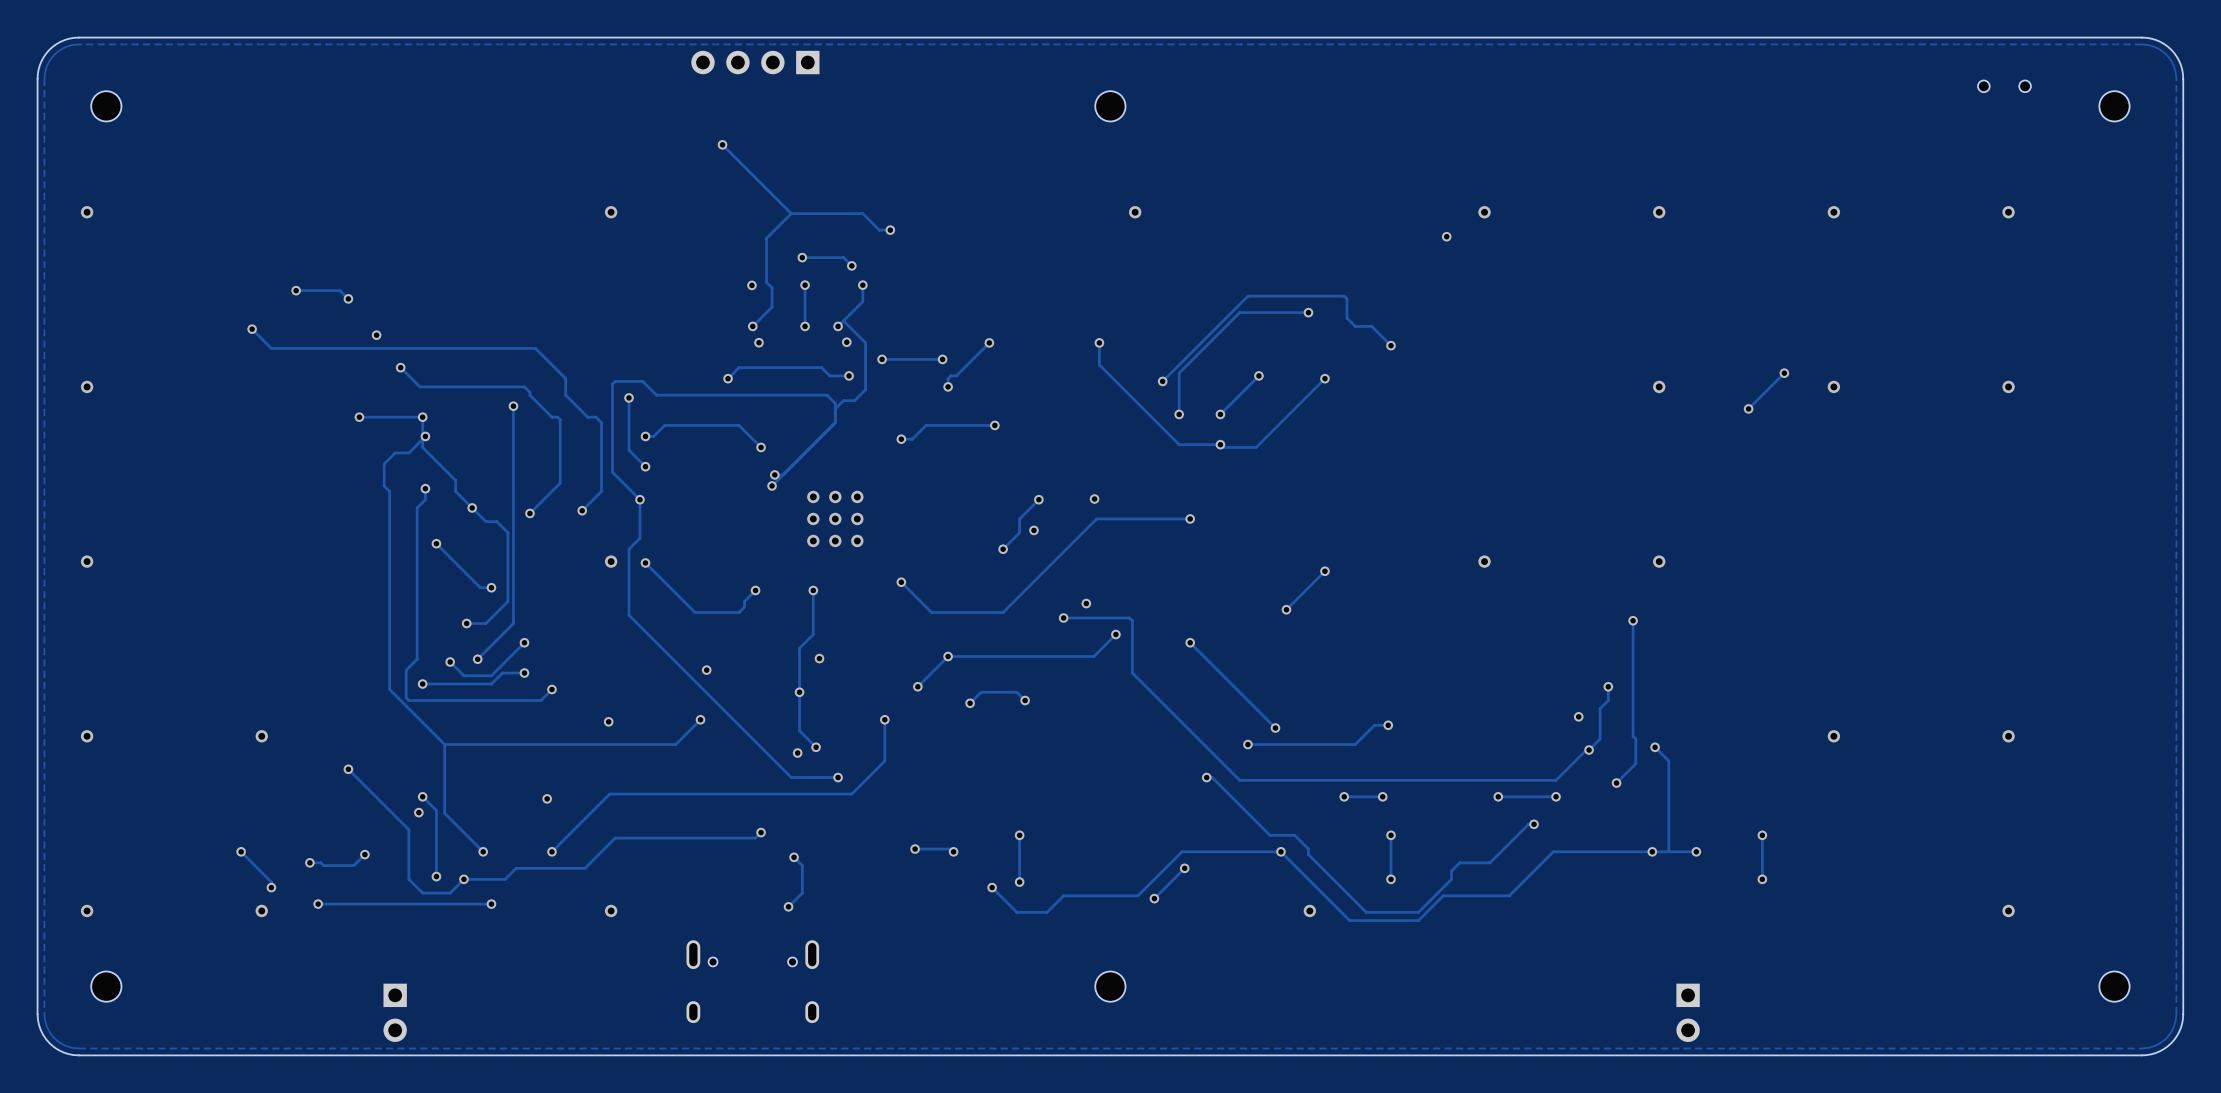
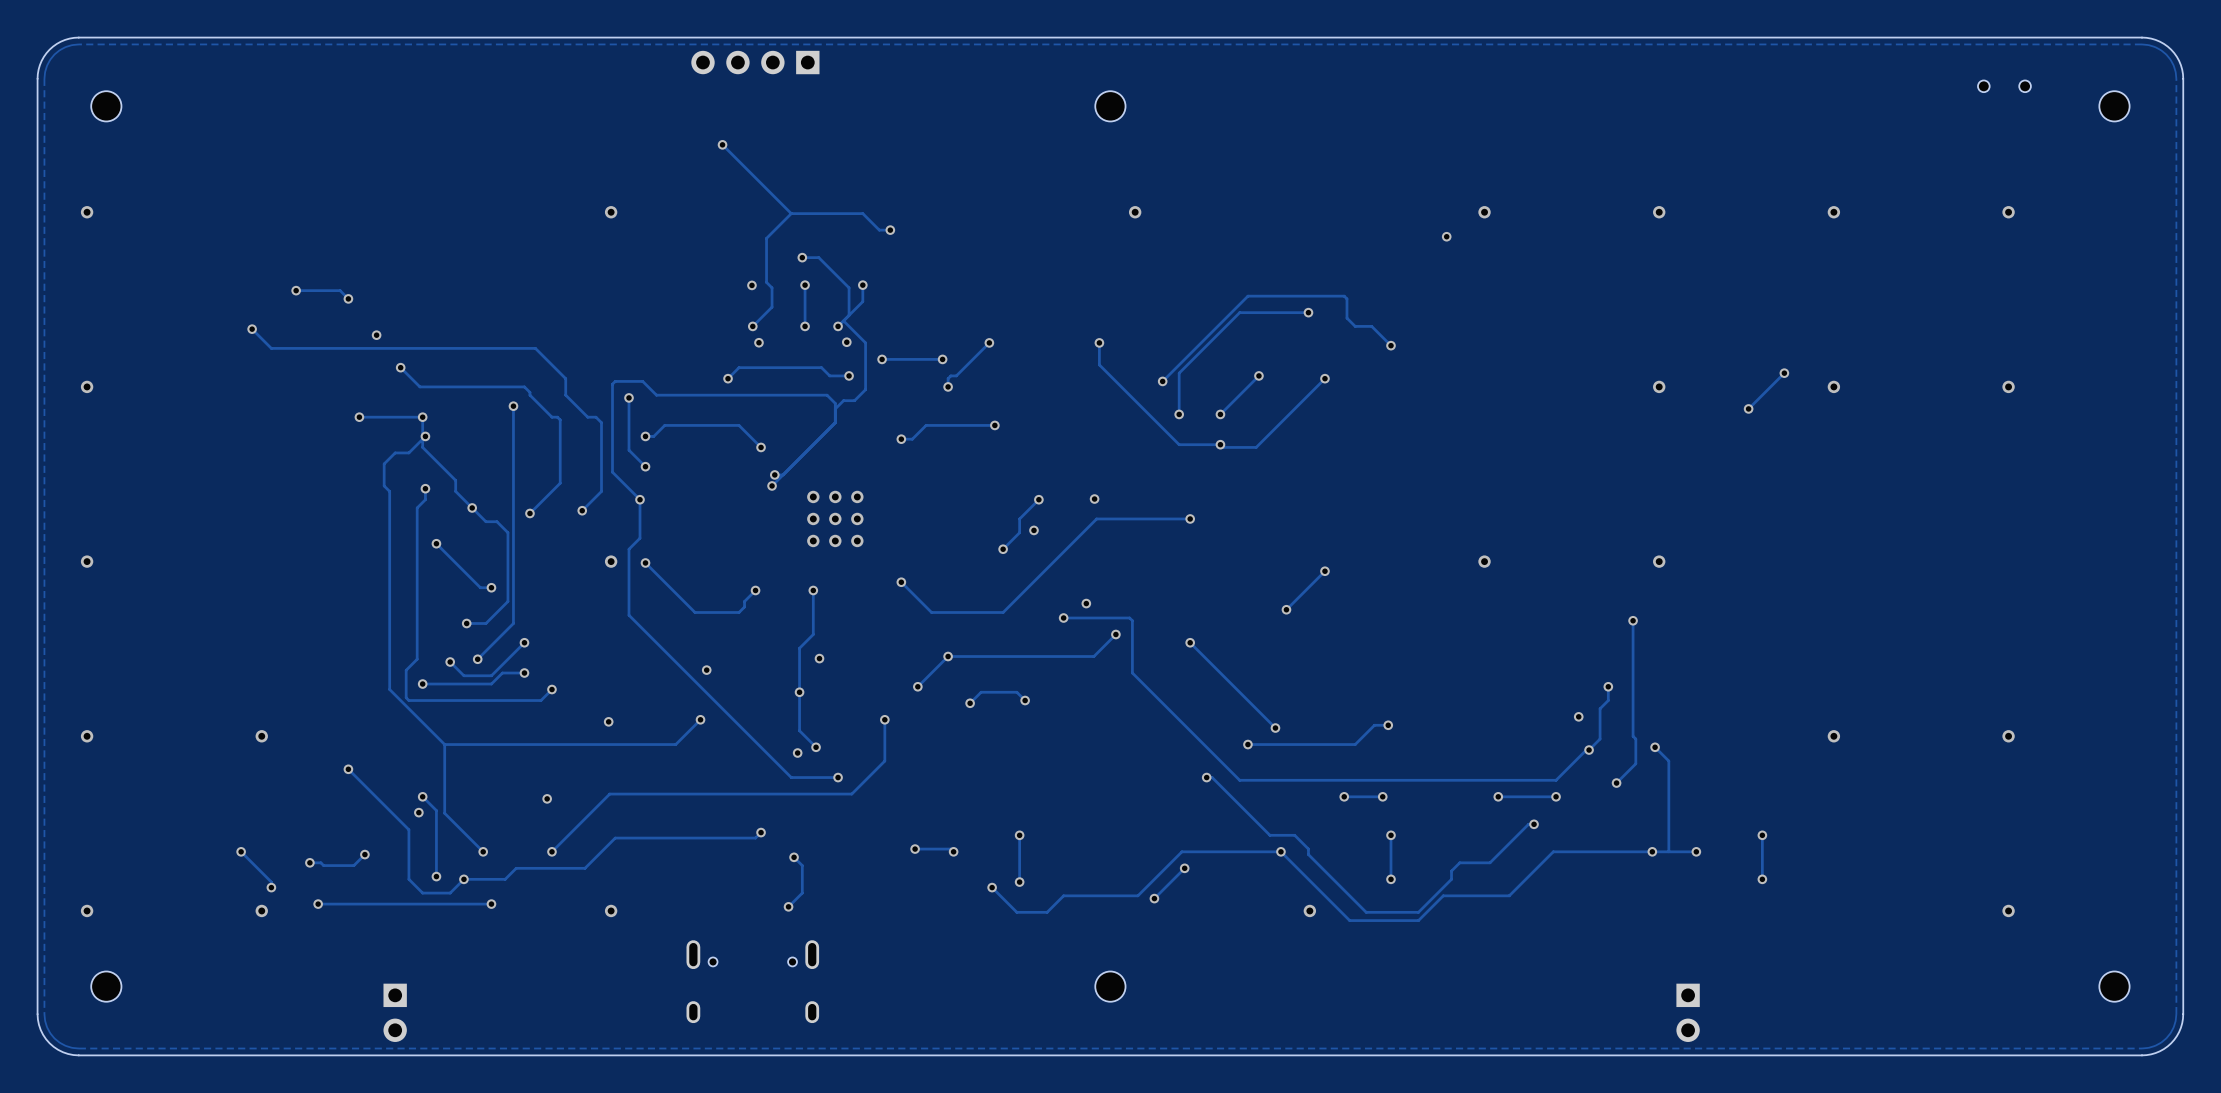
track: (818, 257) (843, 257) (851, 265) -> (818, 257) (849, 287) (849, 315)
via: (851, 265) -> none

